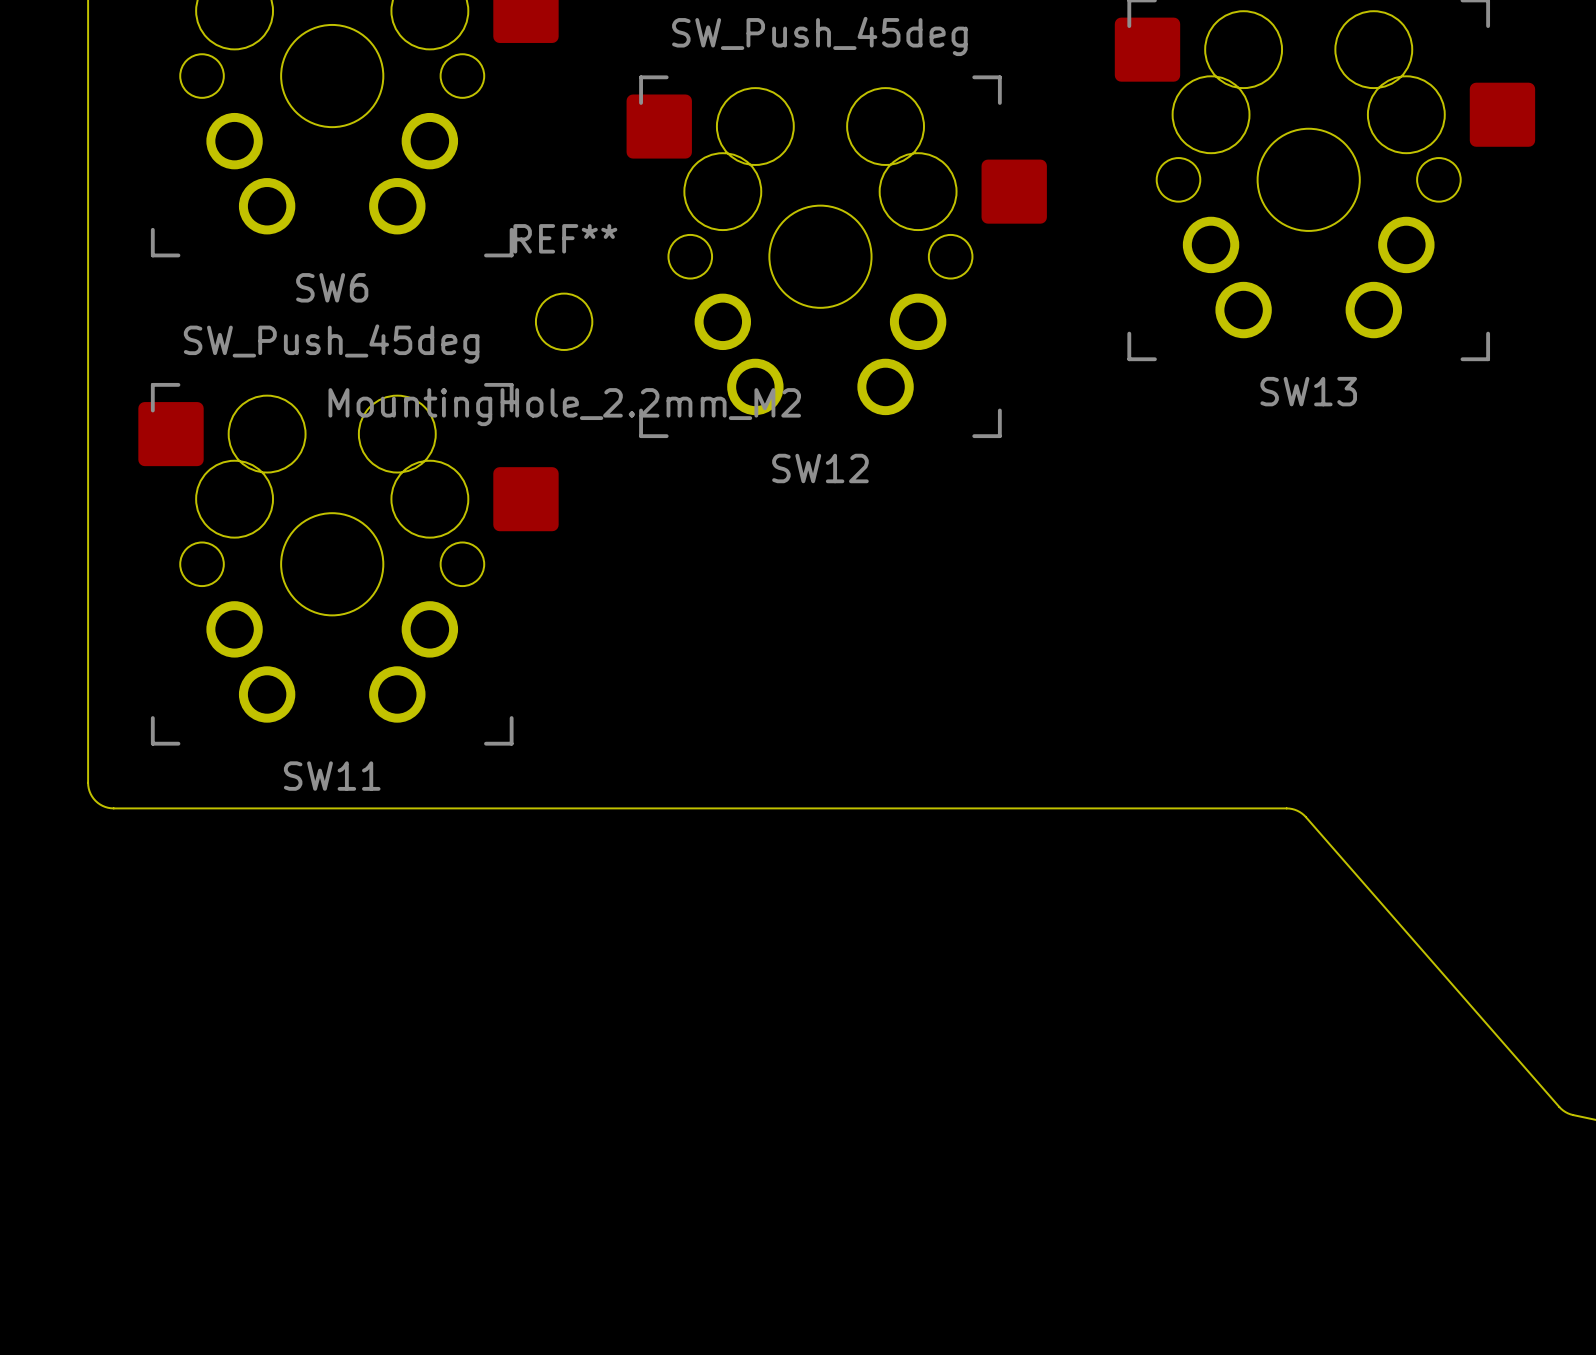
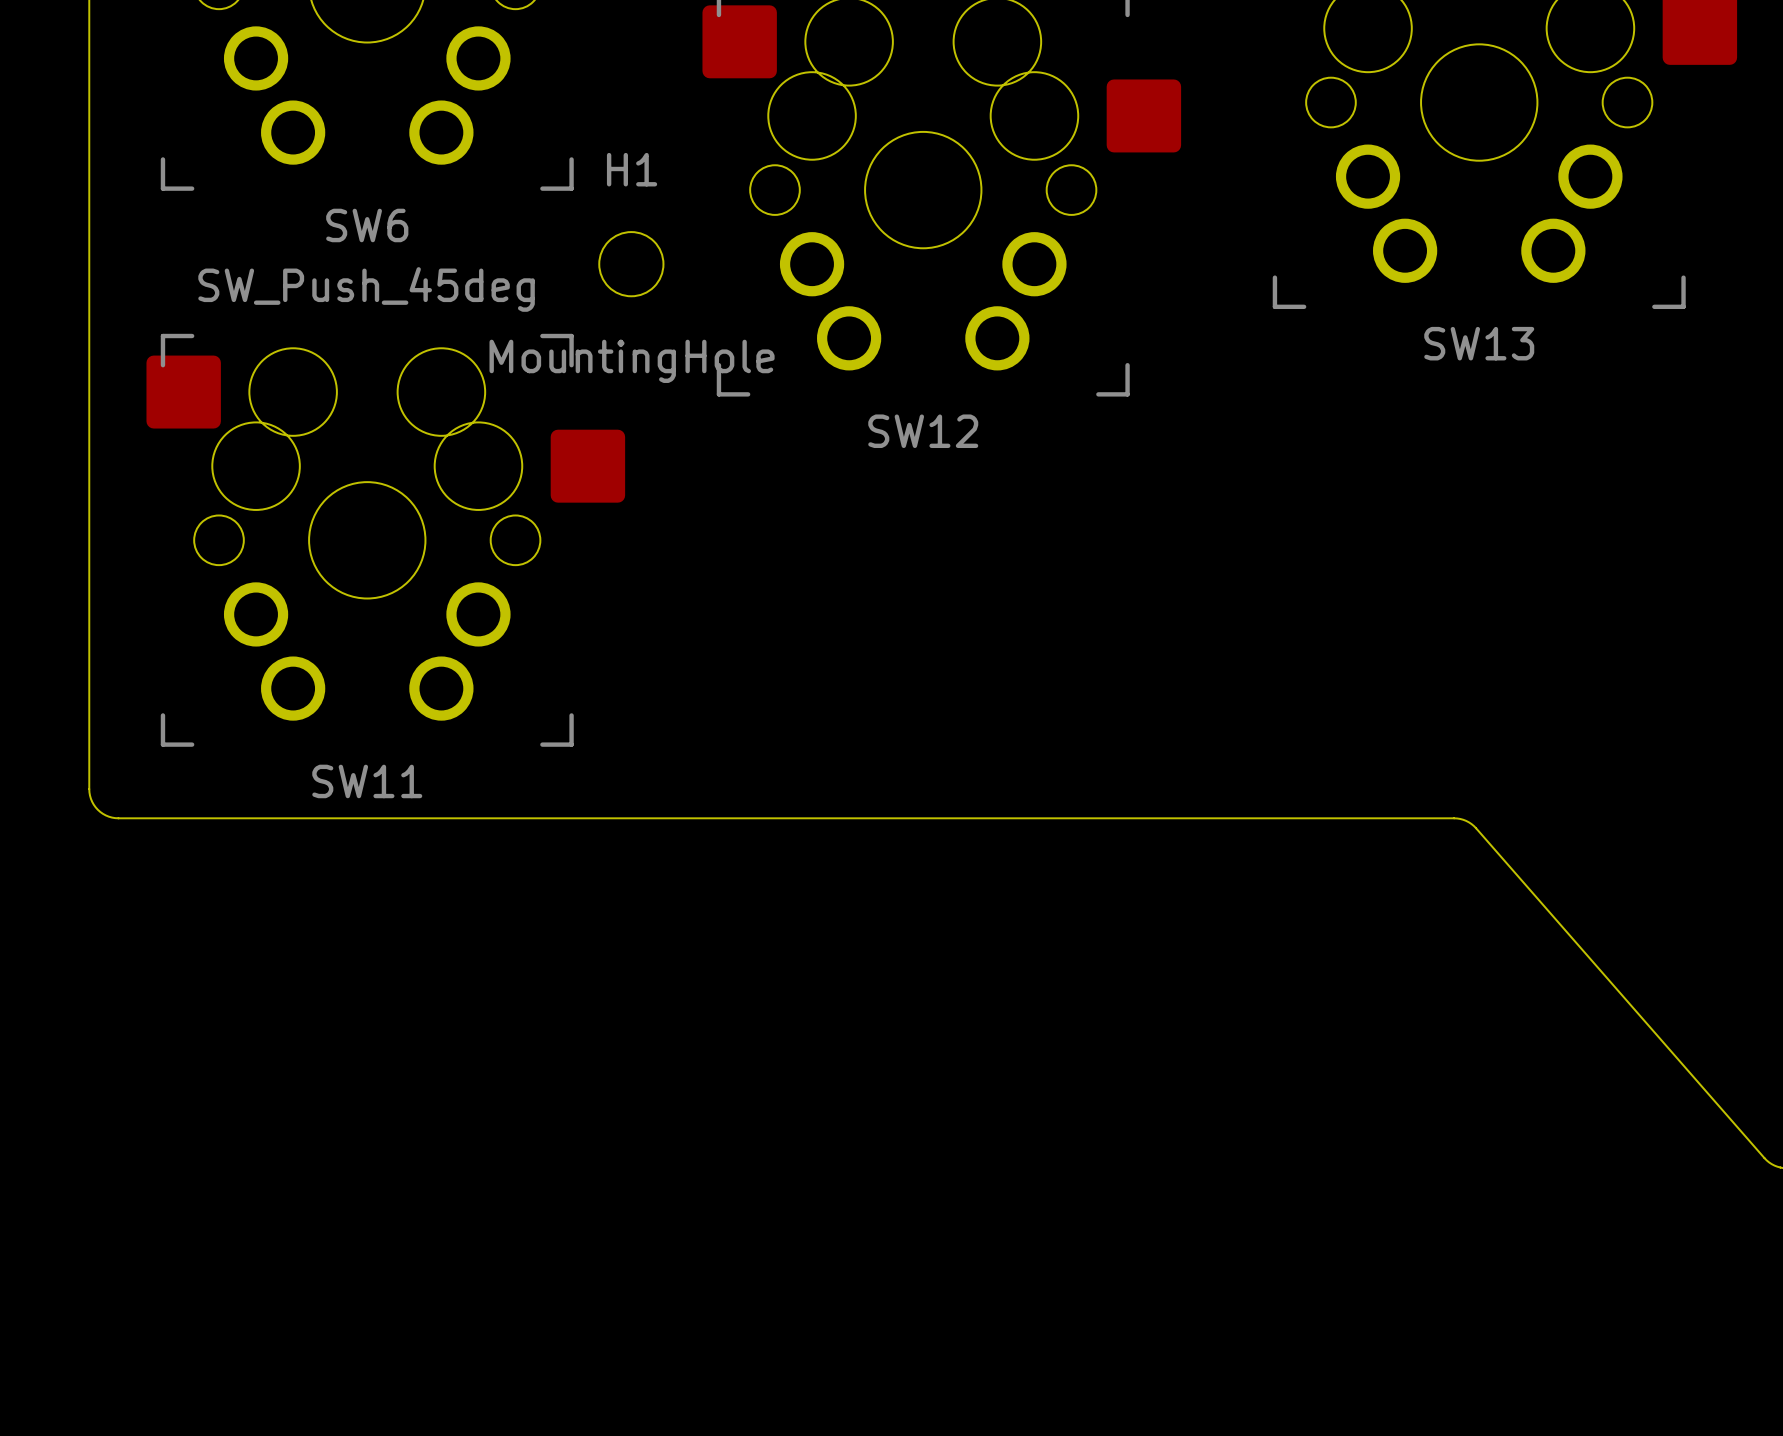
REF** name: REF** (565, 238) -> H1 (632, 169)
REF** value: MountingHole_2.2mm_M2 (564, 407) -> MountingHole (632, 361)

